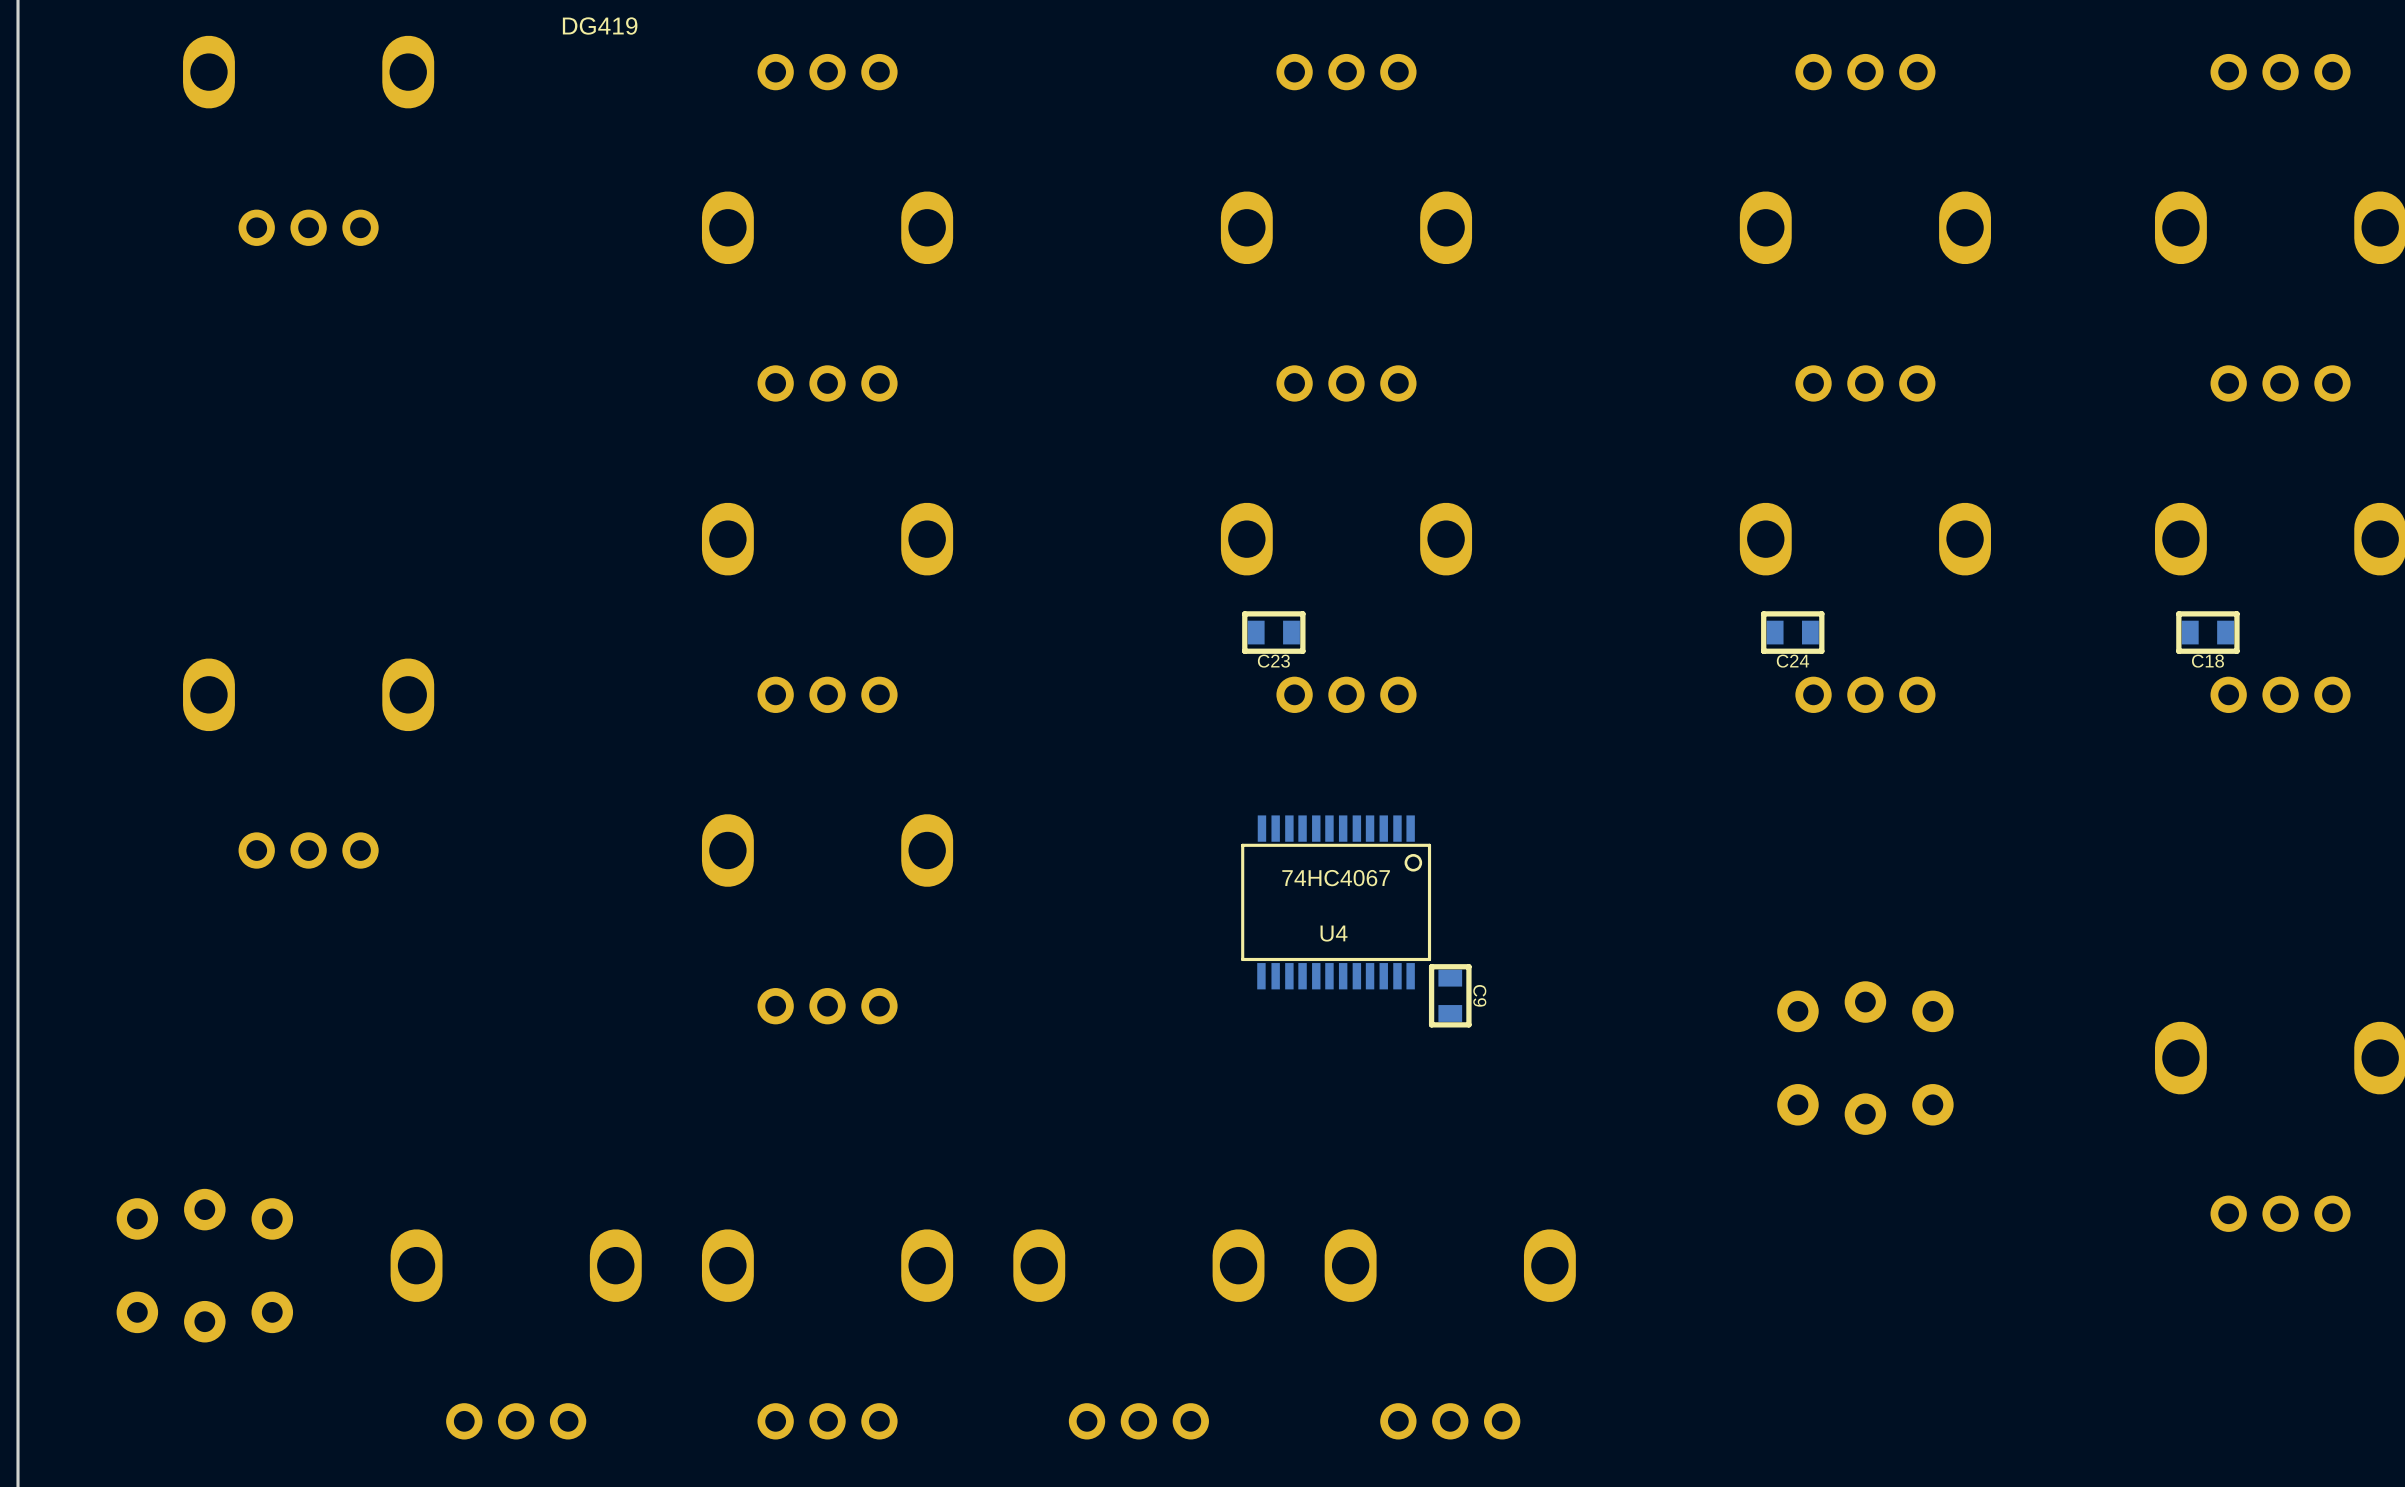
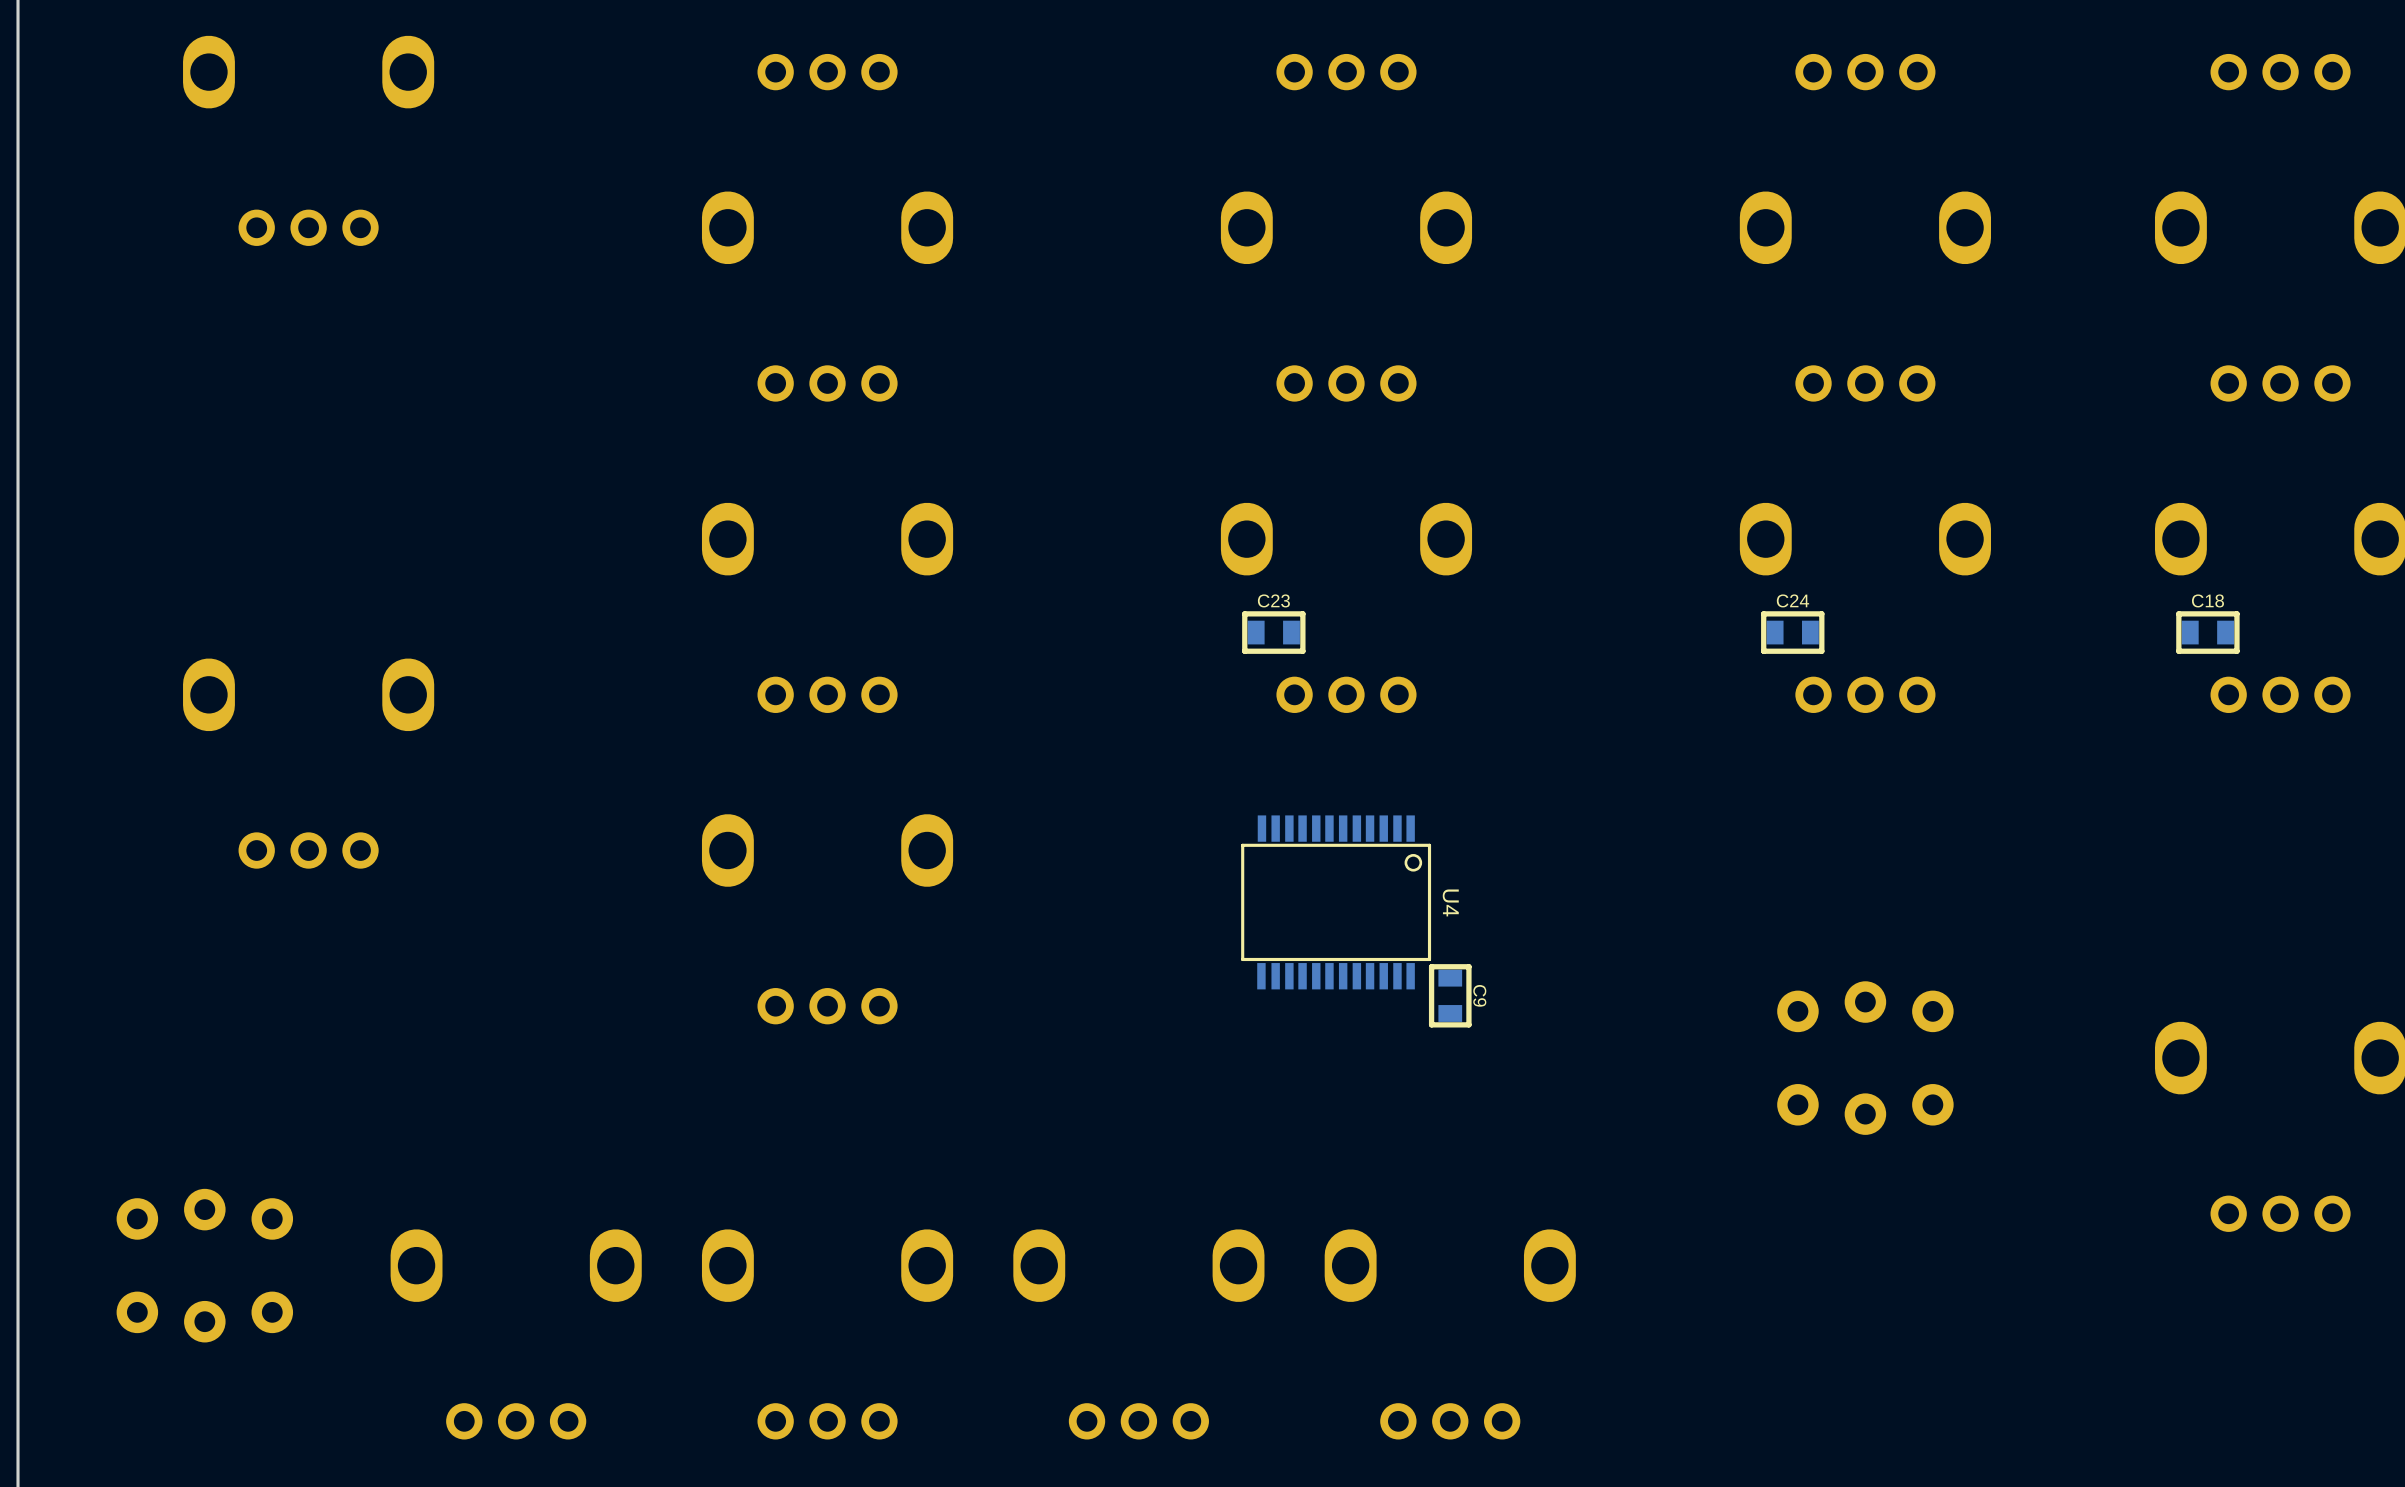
part value: DG419 (600, 26) -> none
C23 name position: C23 (1273, 661) -> C23 (1273, 600)
C24 name position: C24 (1792, 661) -> C24 (1792, 600)
C18 name position: C18 (2207, 661) -> C18 (2207, 600)
U4 value: 74HC4067 (1336, 878) -> none
U4 name rotation: 0° (1334, 933) -> 90° clockwise (1450, 902)
U4 name position: U4 (1334, 933) -> U4 (1450, 902)

